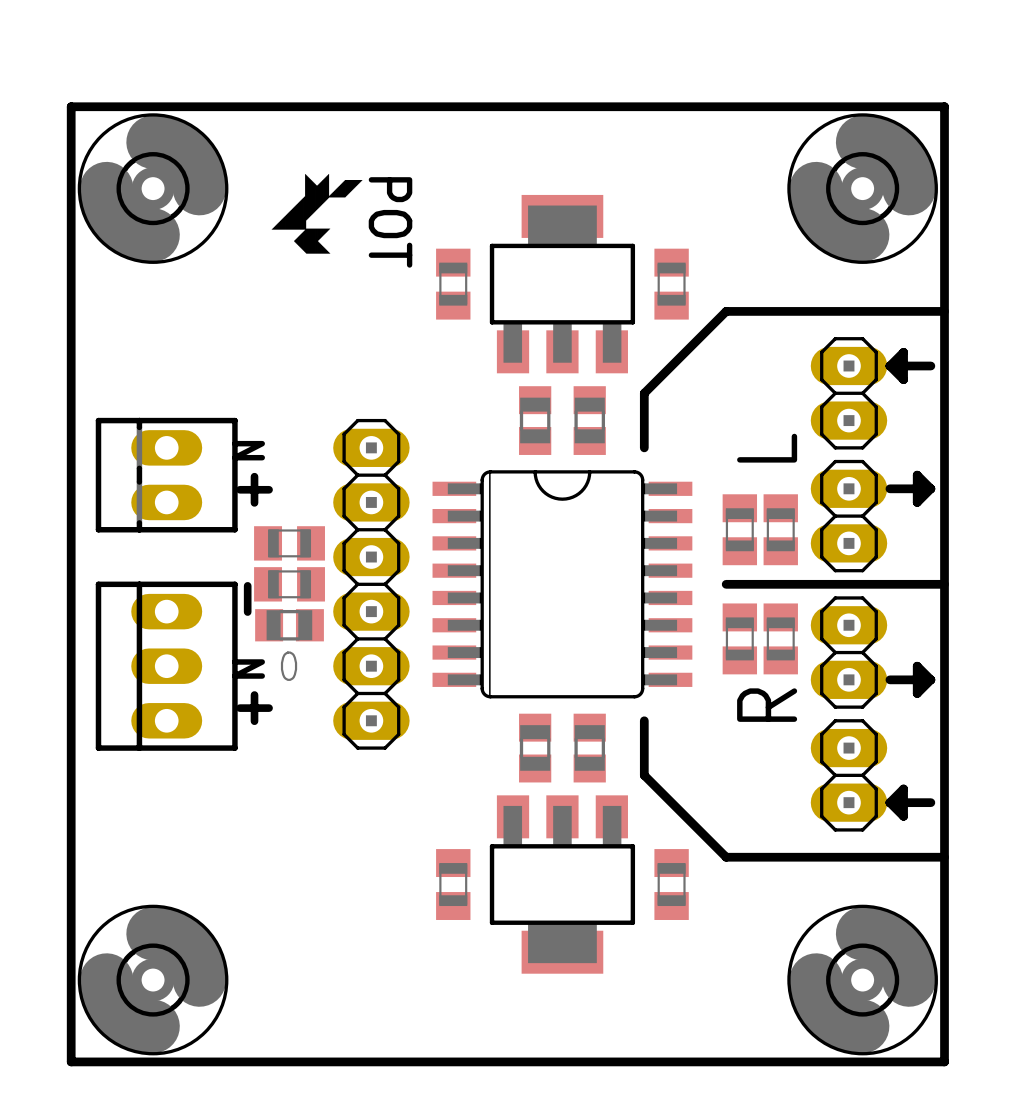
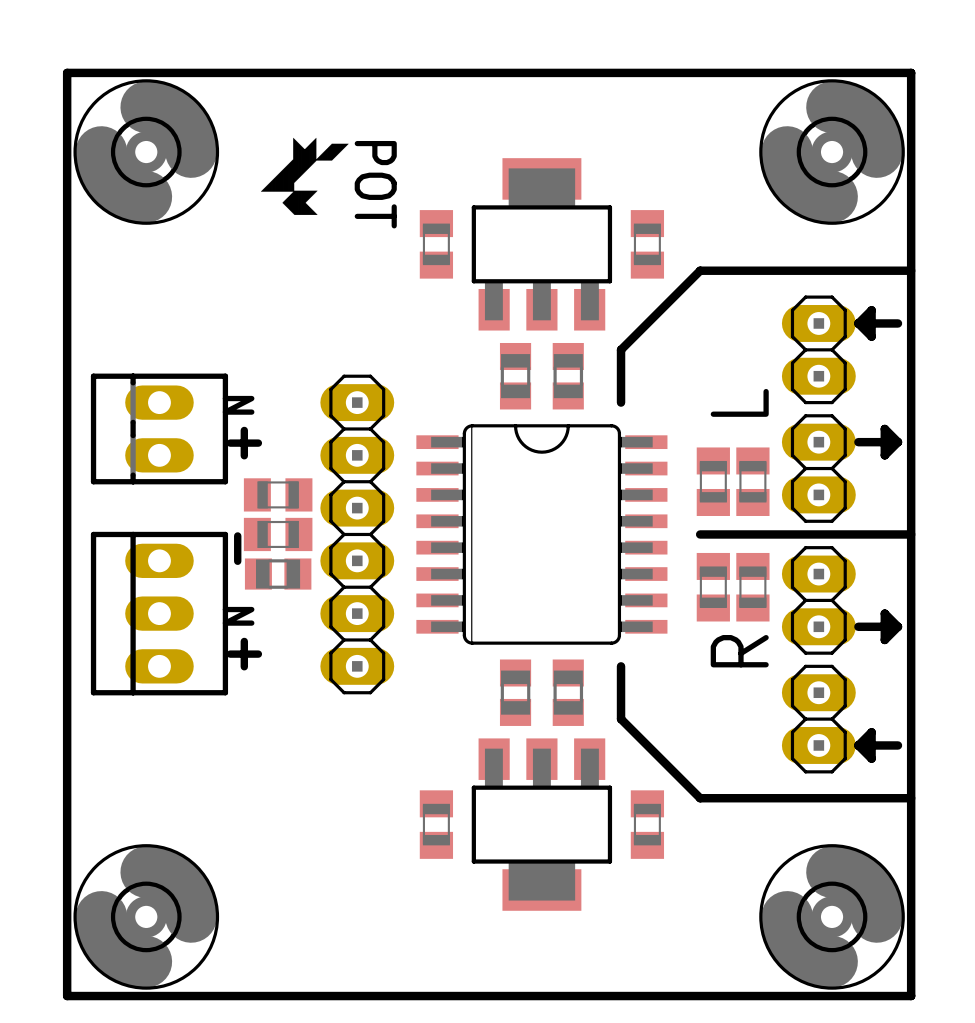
part value: 0 (289, 666) -> none

